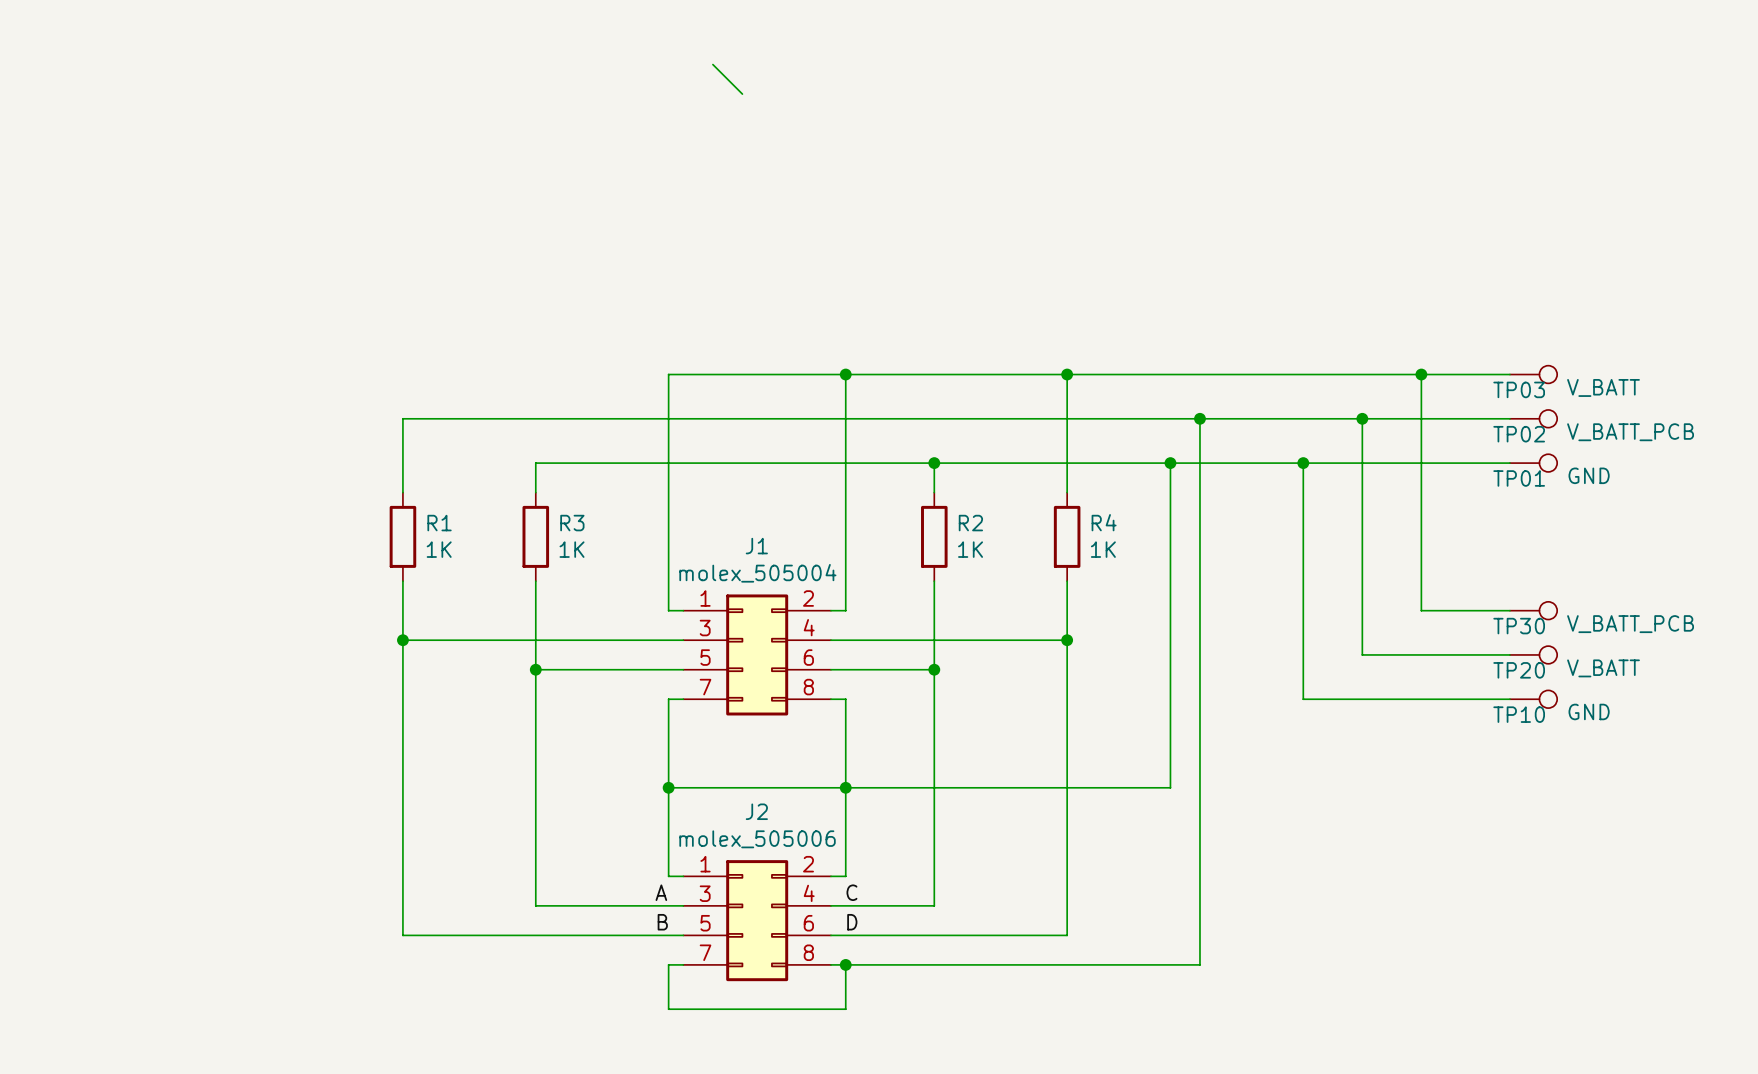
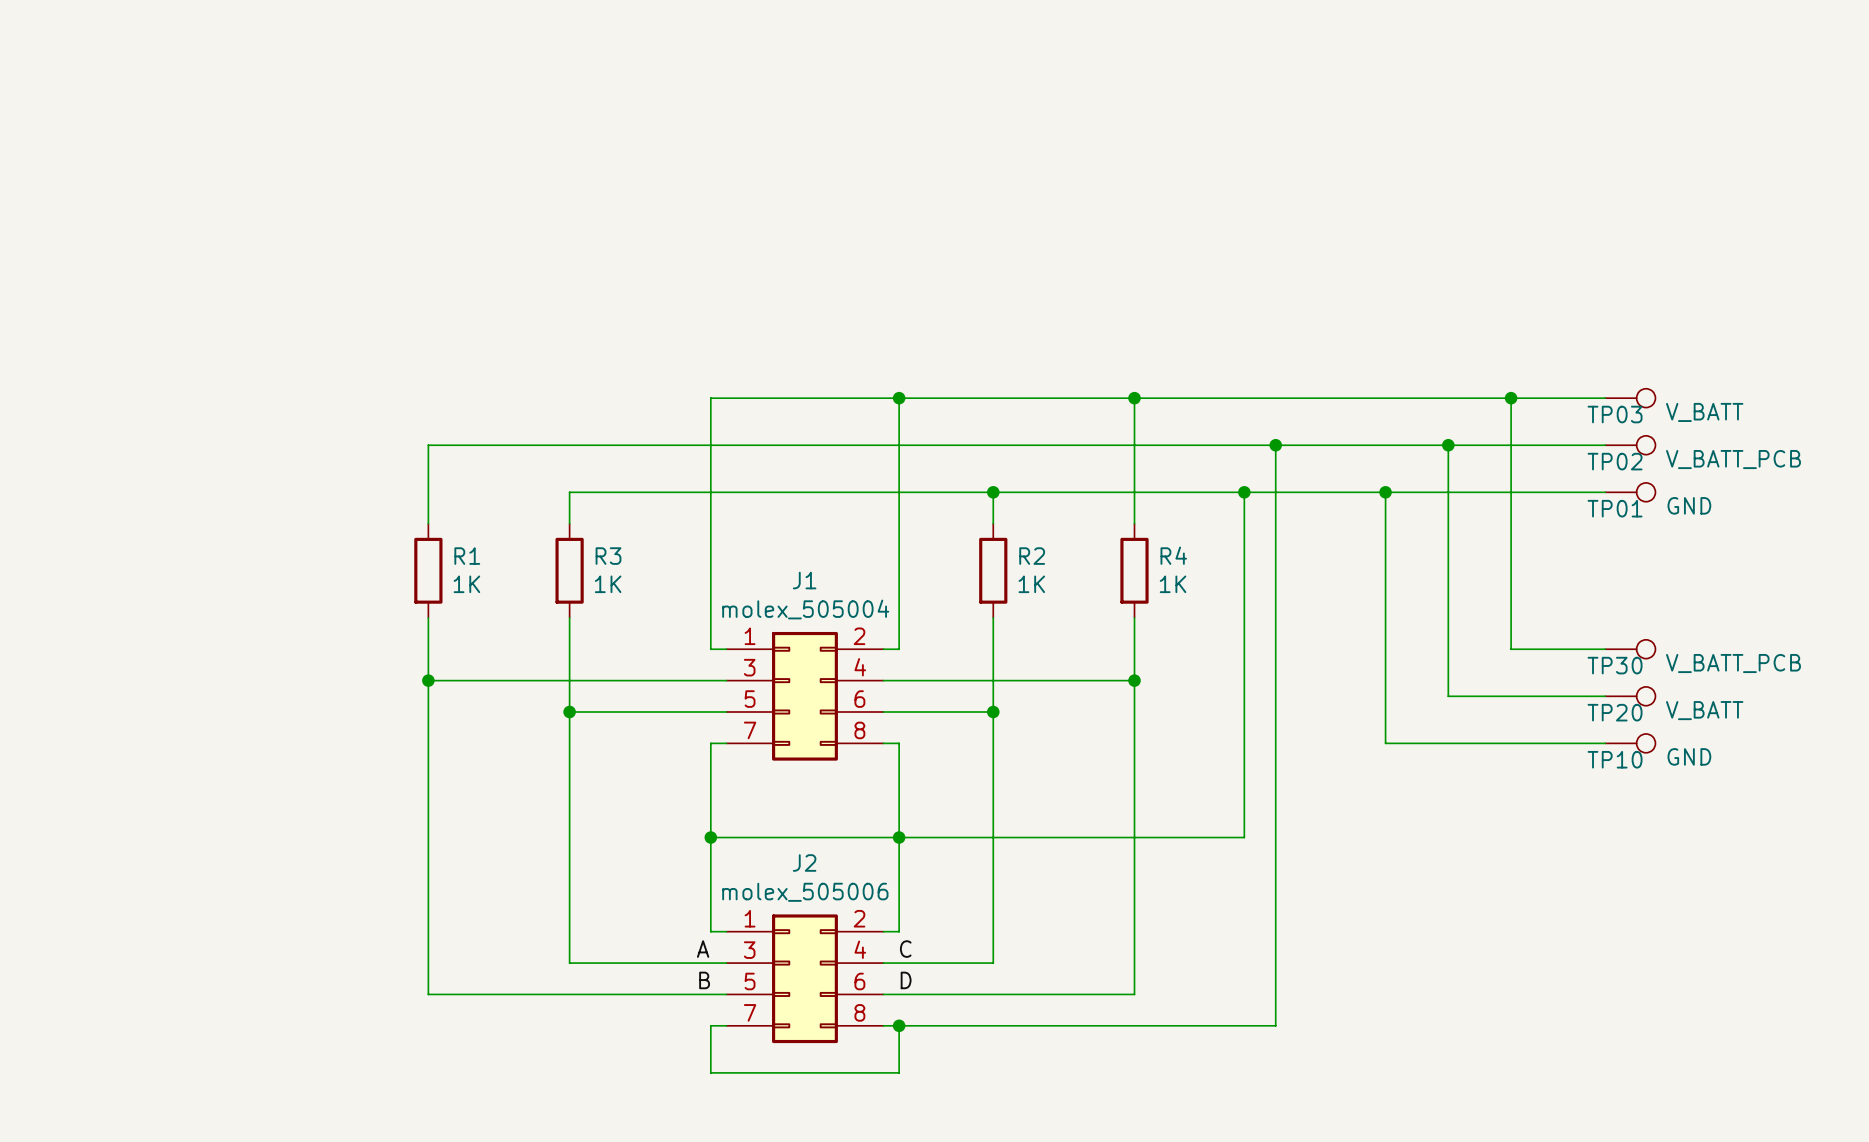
wire: (712, 64) (742, 94) -> none

